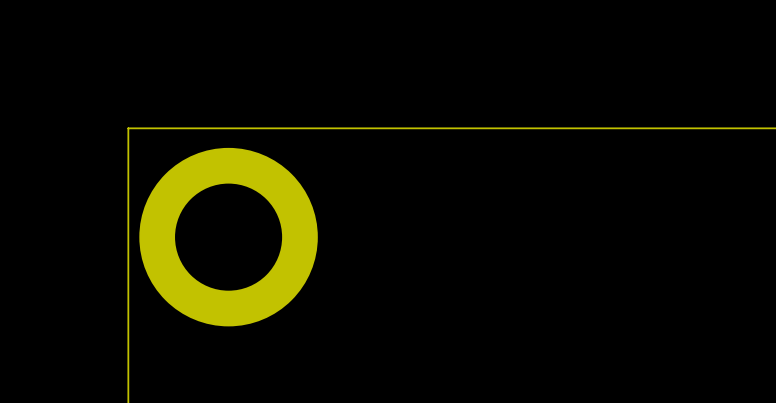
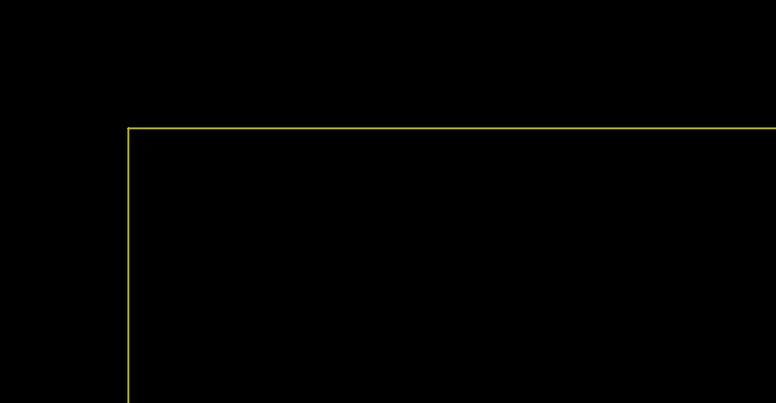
part: (228, 237) -> none

